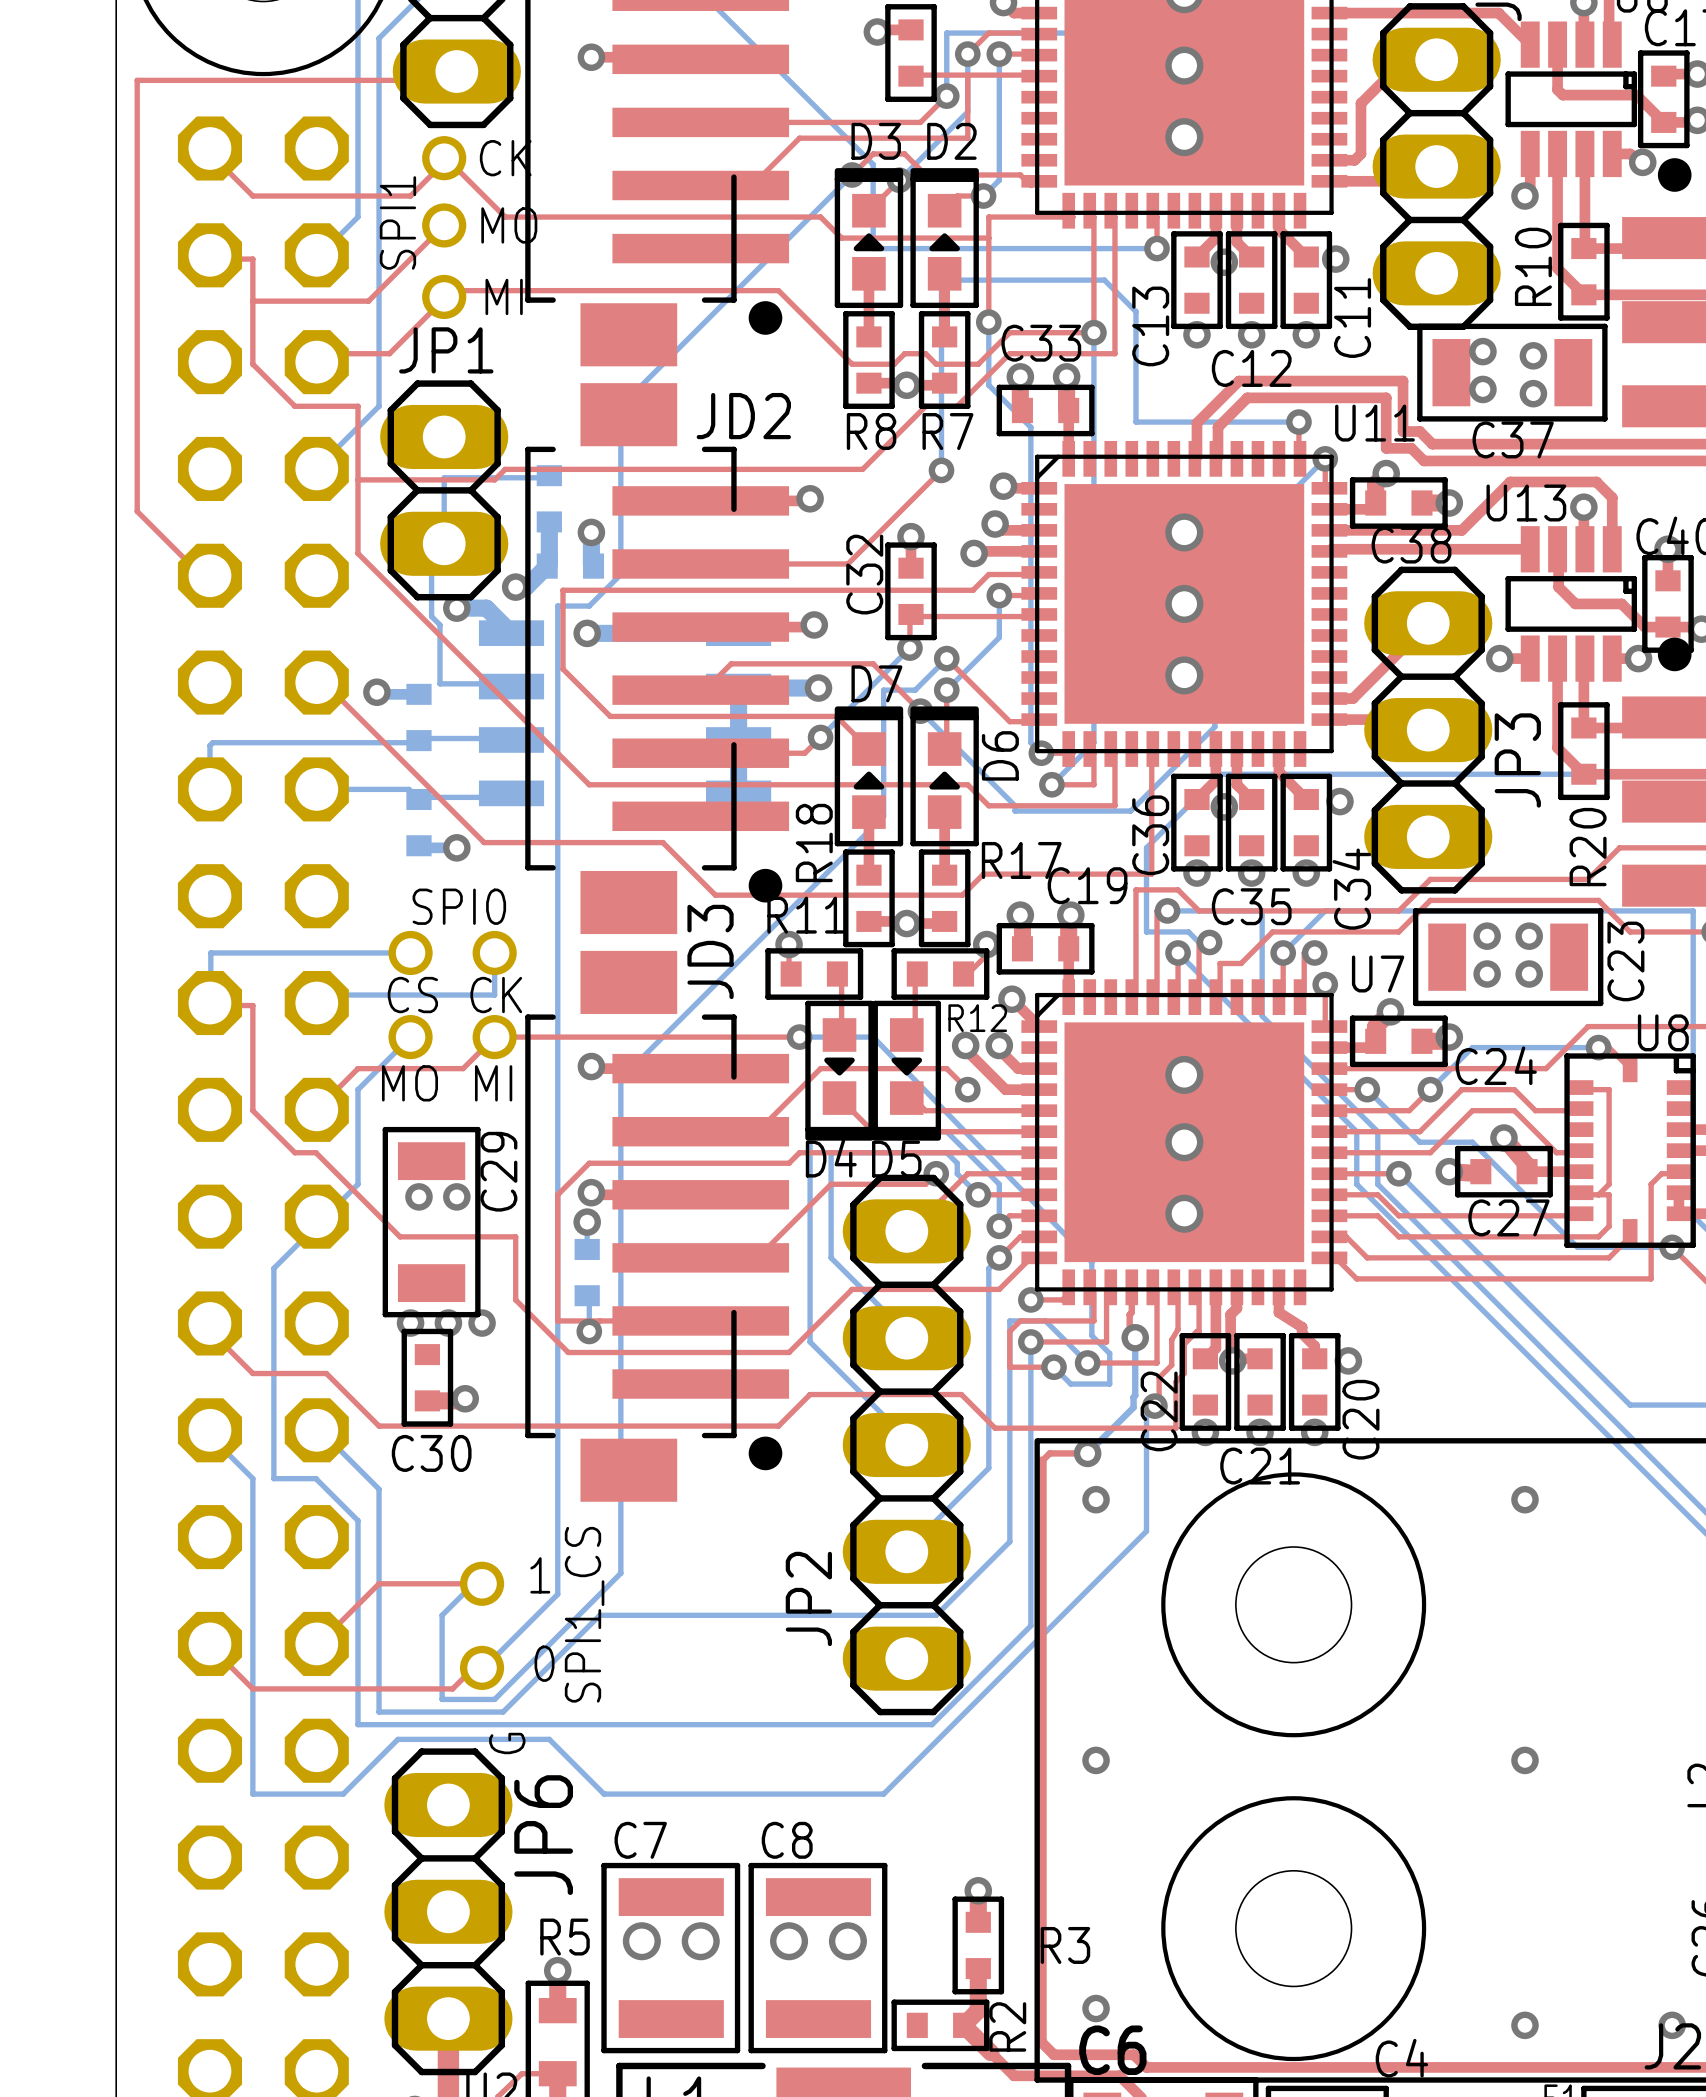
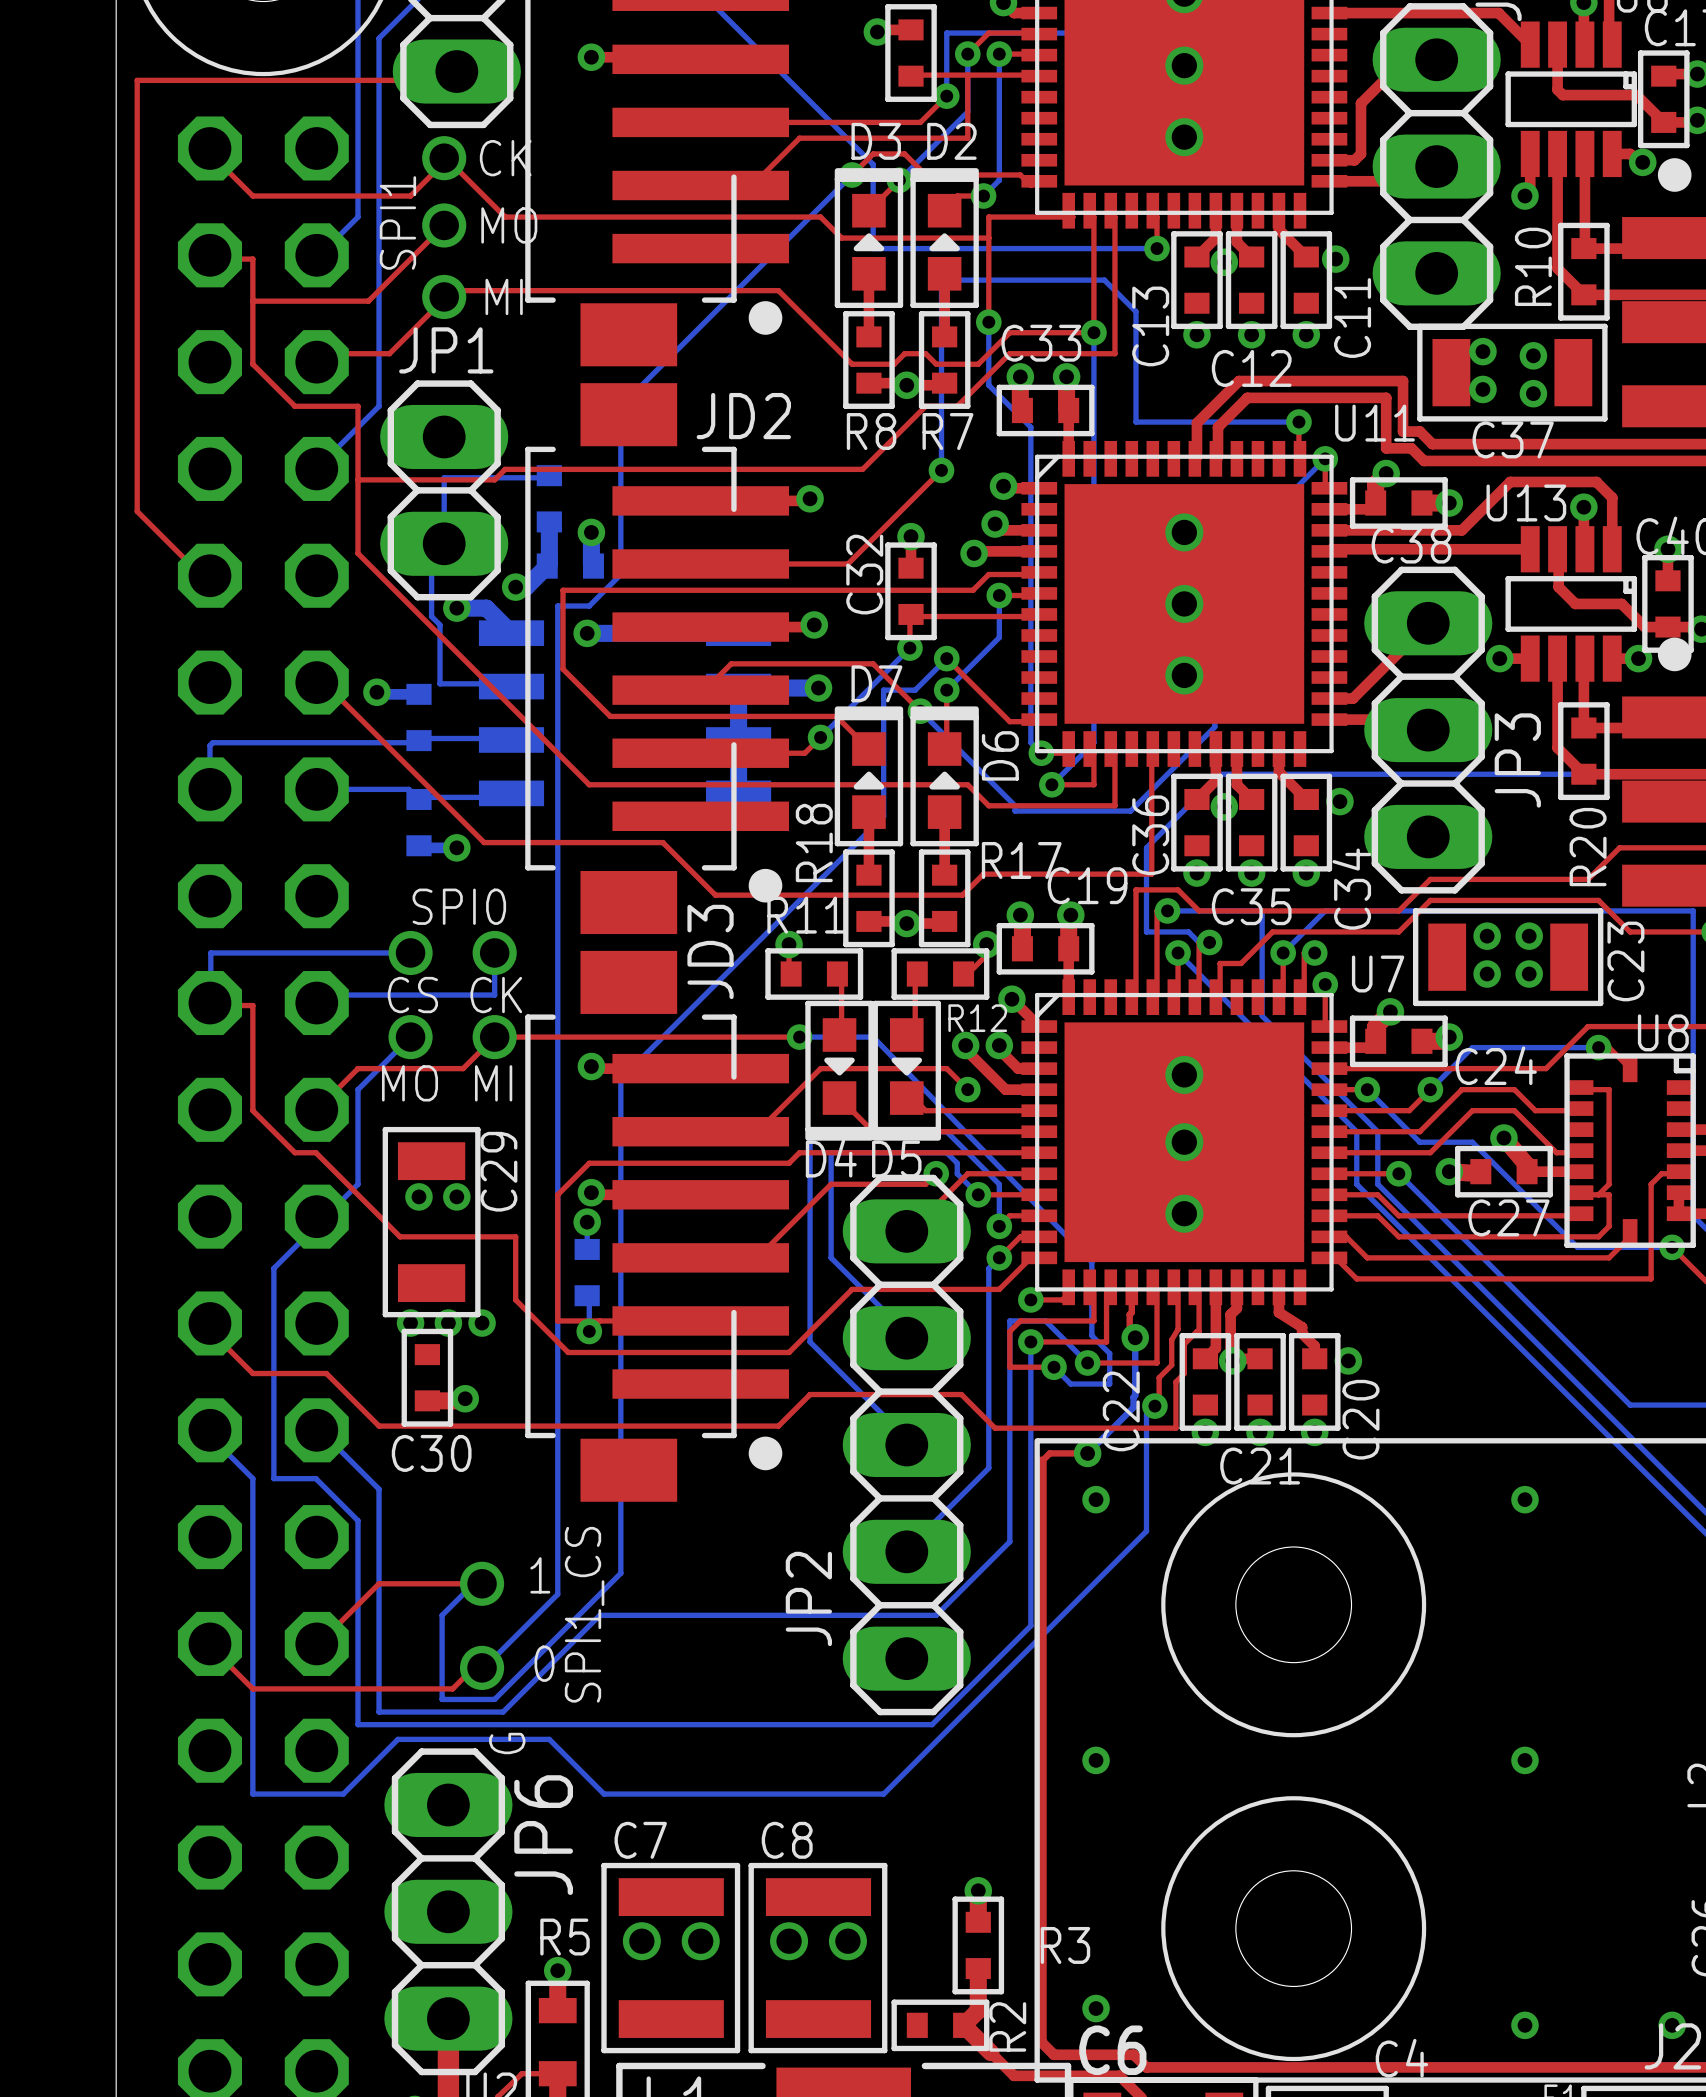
C22 name position: C22 (1159, 1411) -> C22 (1121, 1411)

